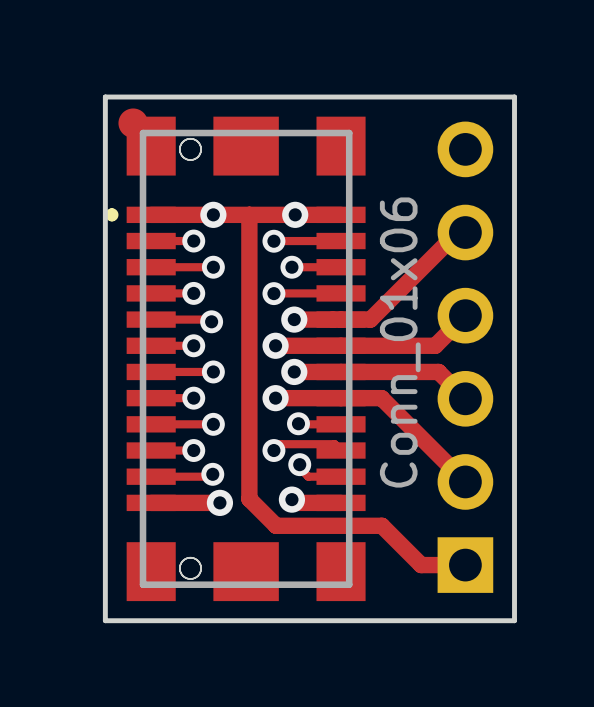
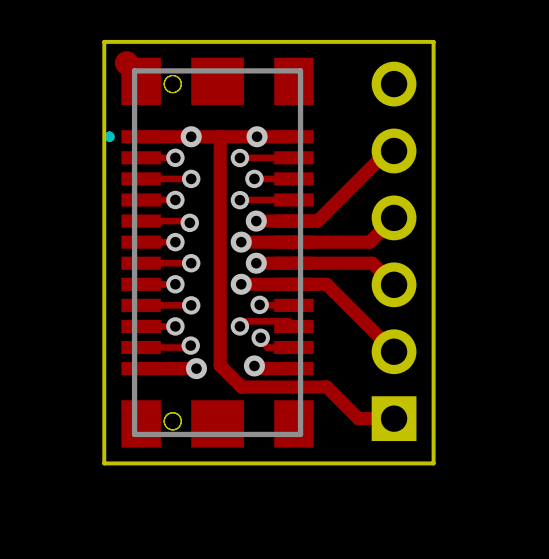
part value: Conn_01x06 (400, 342) -> none

